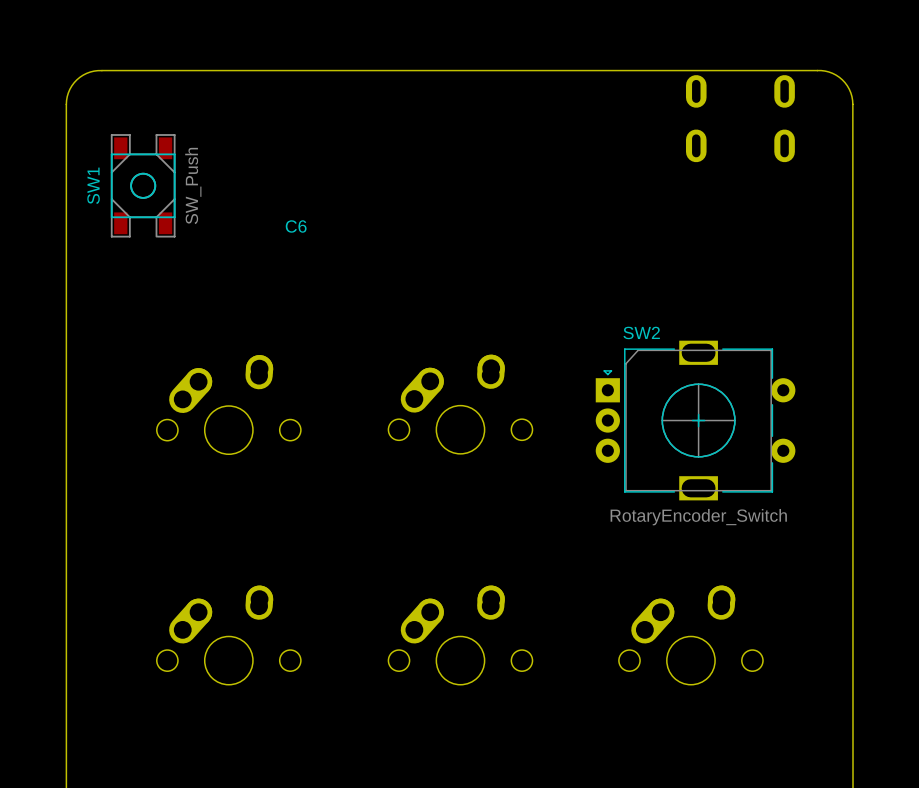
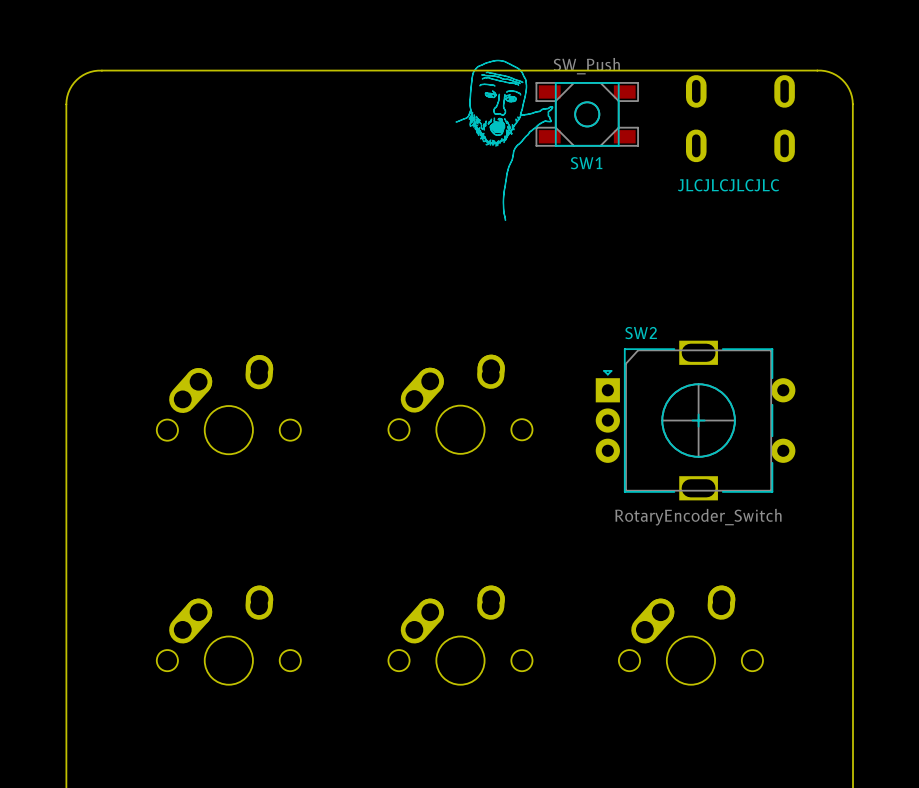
drawing: none -> [455, 59, 554, 221]
SW1 rotation: 0° (143, 185) -> 90° counterclockwise (587, 114)
SW1 position: (143, 185) -> (587, 114)
text: none -> JLCJLCJLCJLC (728, 185)
C6: (296, 226) -> none

